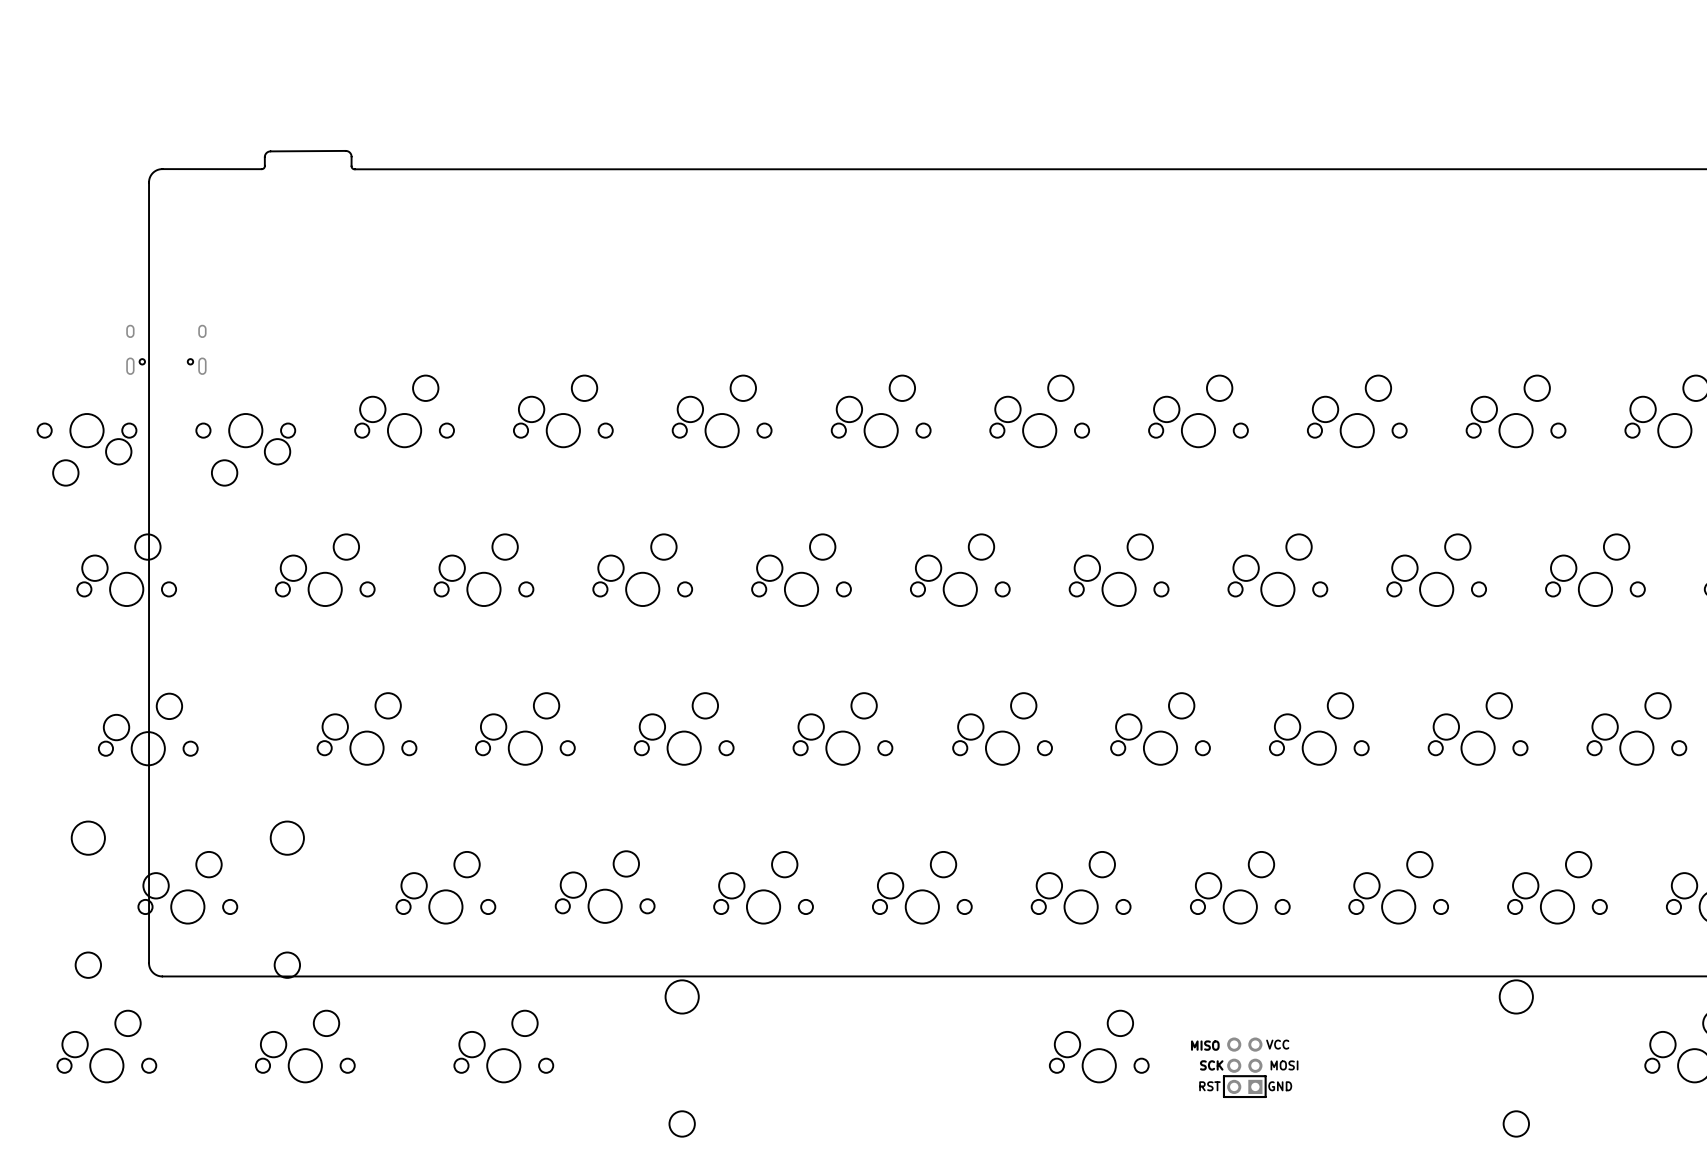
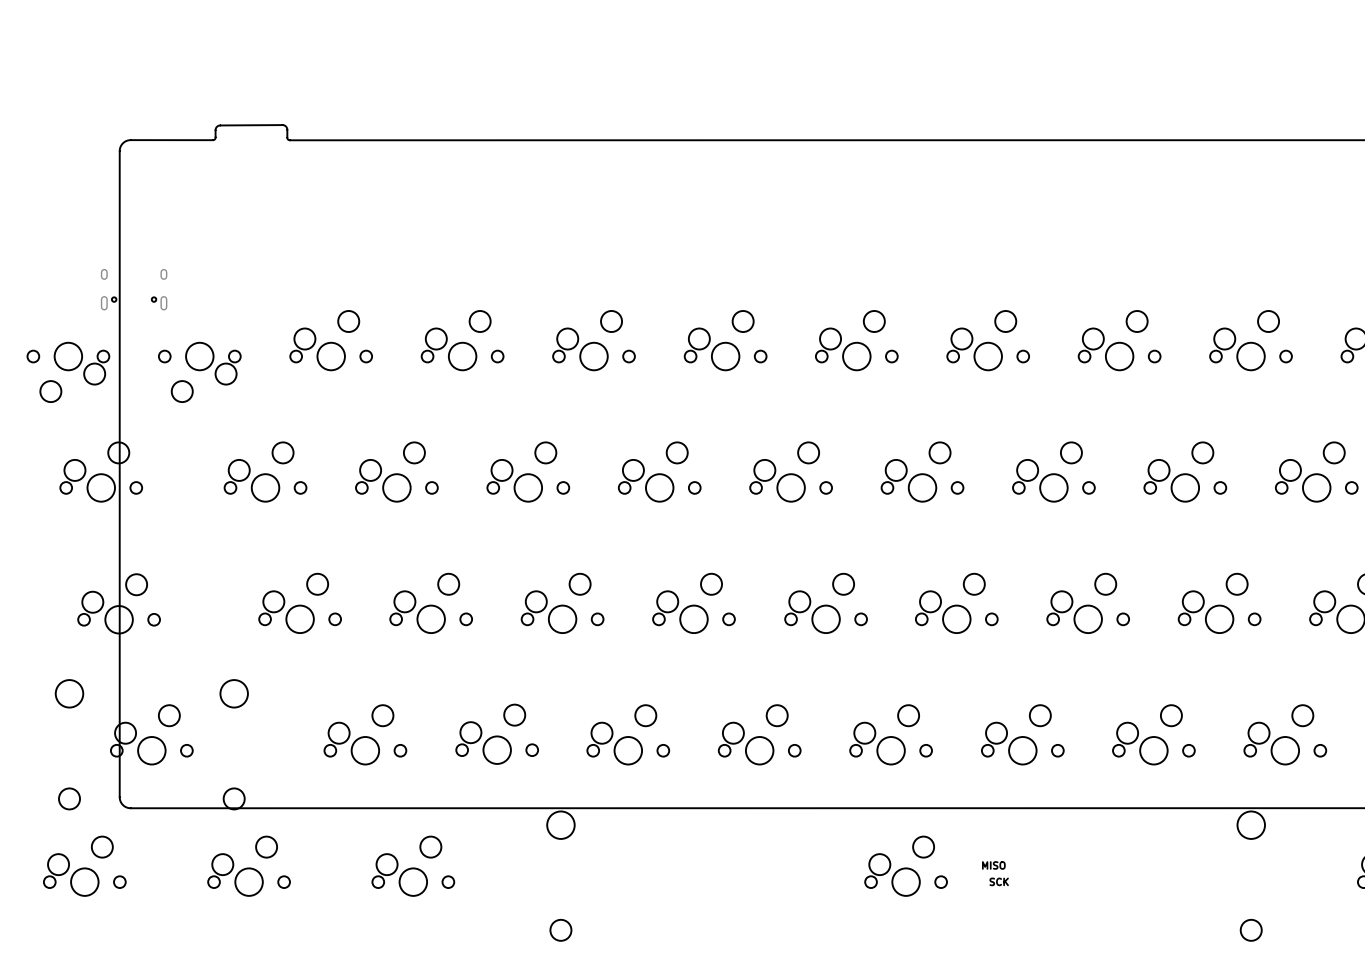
part: (1244, 1067) -> none

